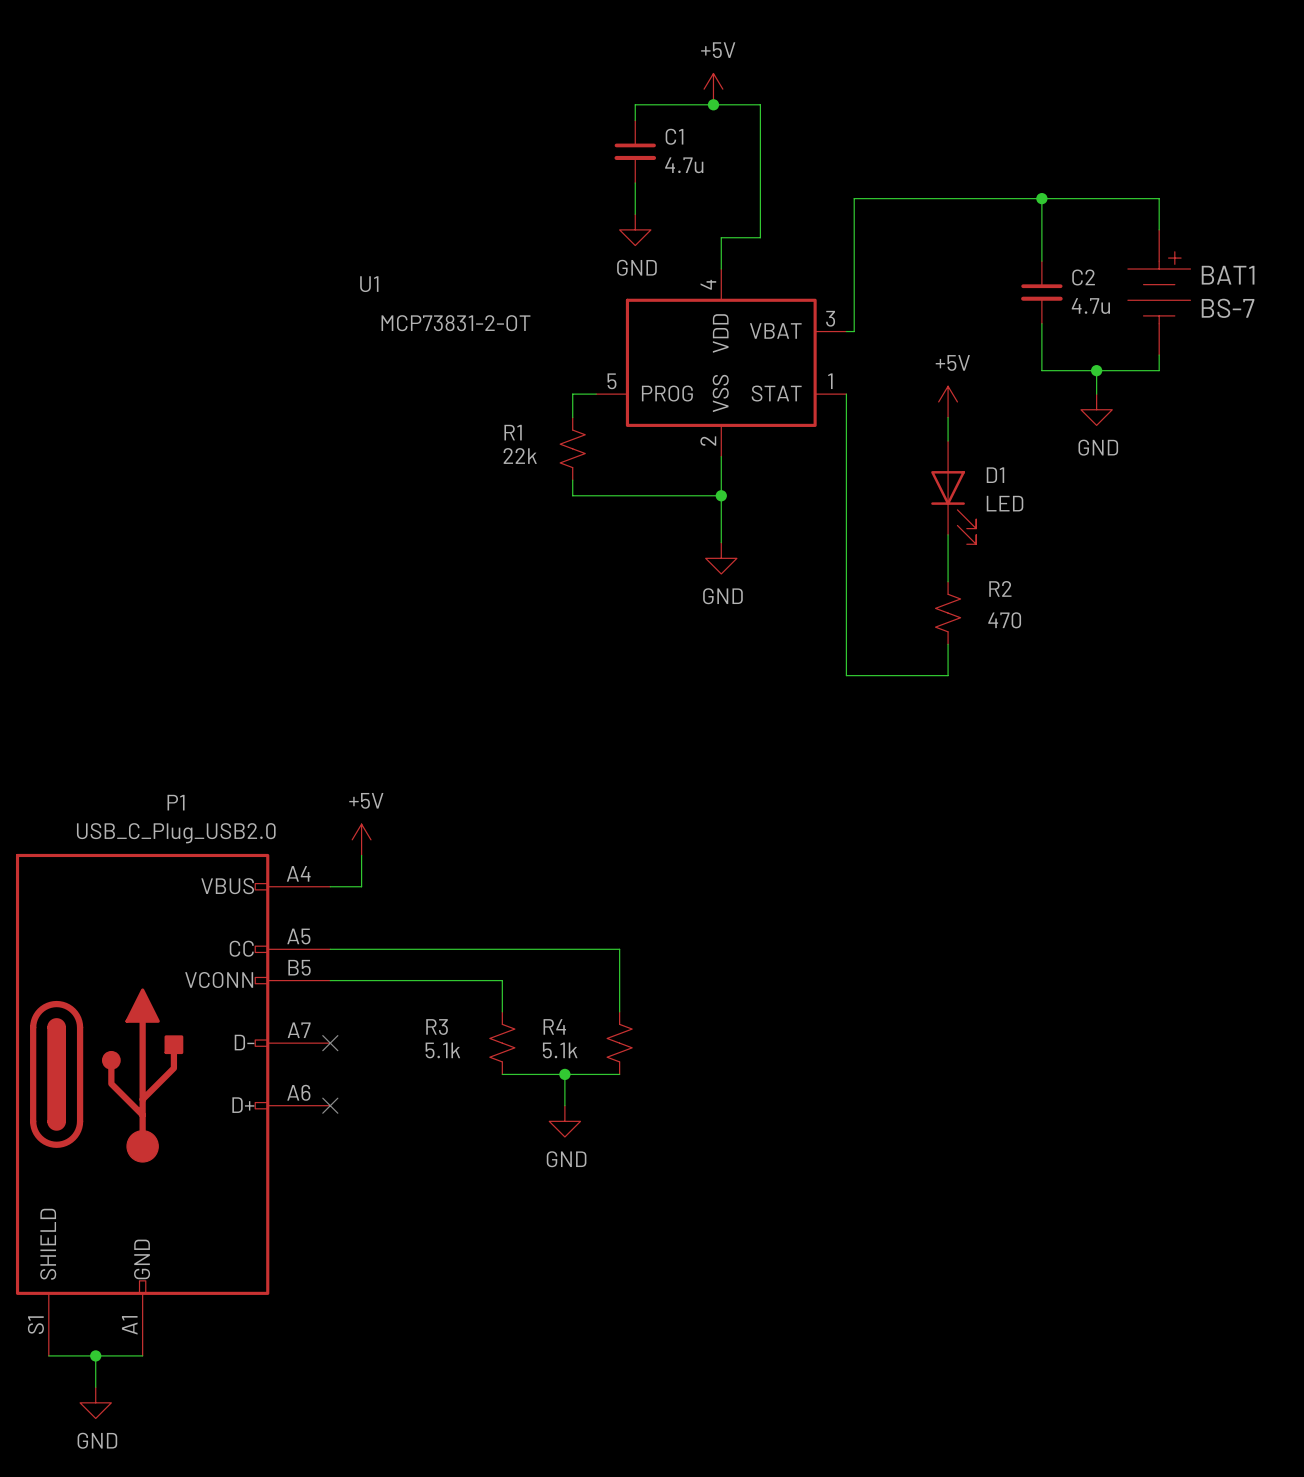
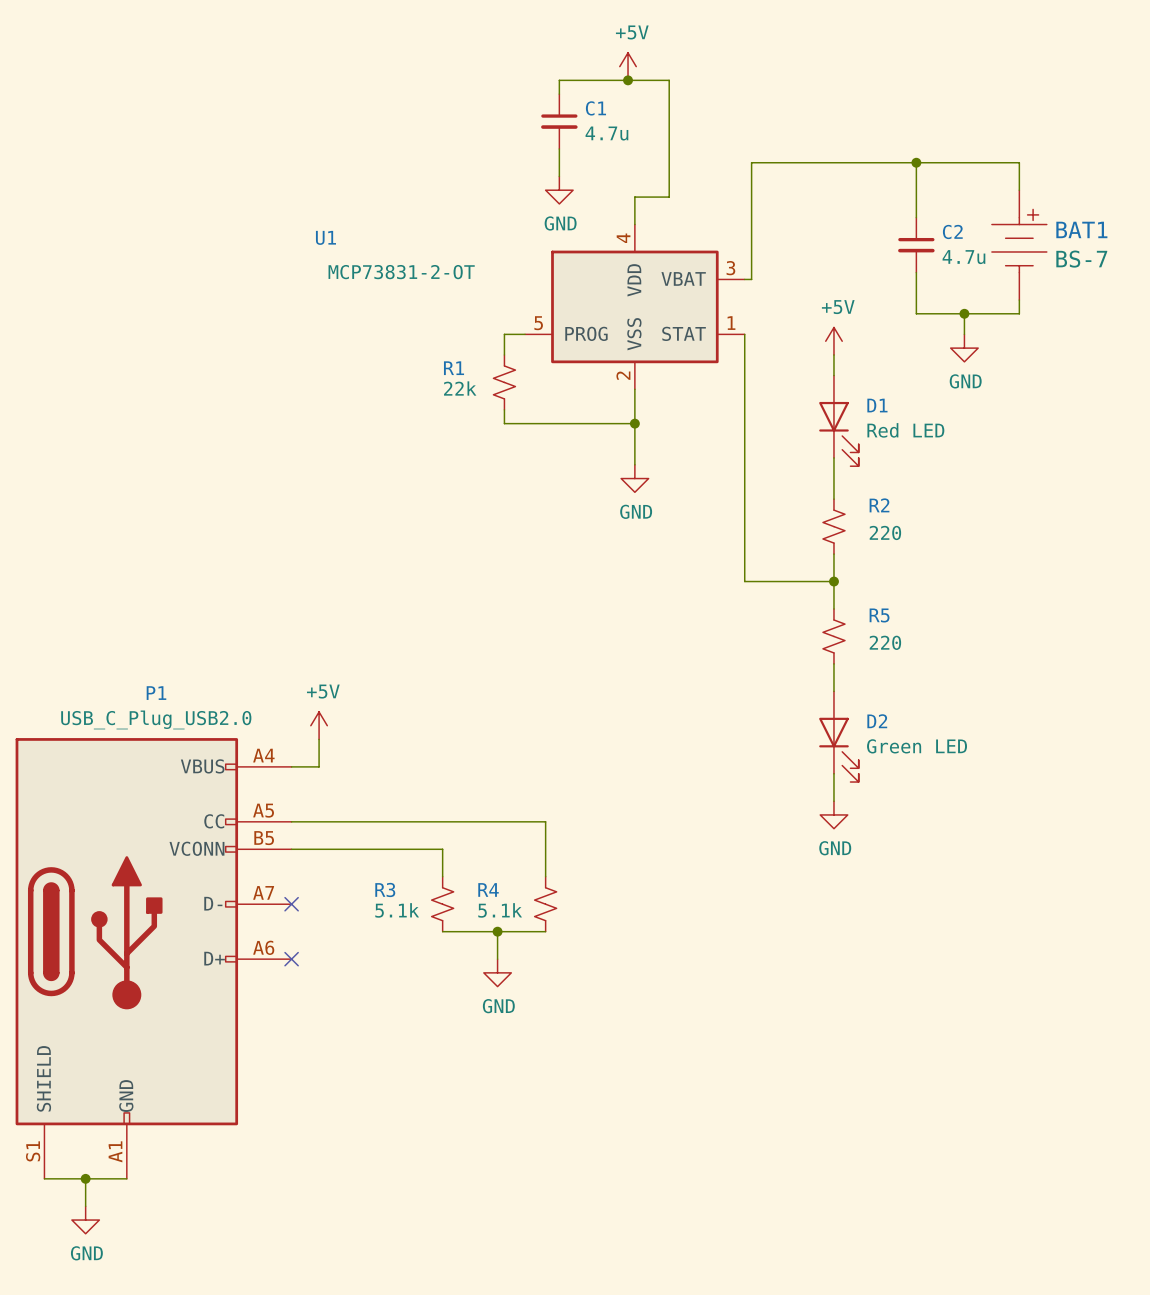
D1 value: LED (1005, 503) -> Red LED (905, 430)
R2 value: 470 (1004, 620) -> 220 (885, 532)
wire: none -> (833, 581) (833, 609)
junction: none -> (833, 581)
R5: none -> 220 (833, 636)
wire: none -> (833, 663) (833, 691)
D2: none -> Green LED (838, 736)
wire: none -> (833, 773) (833, 801)
power symbol: none -> GND (833, 814)

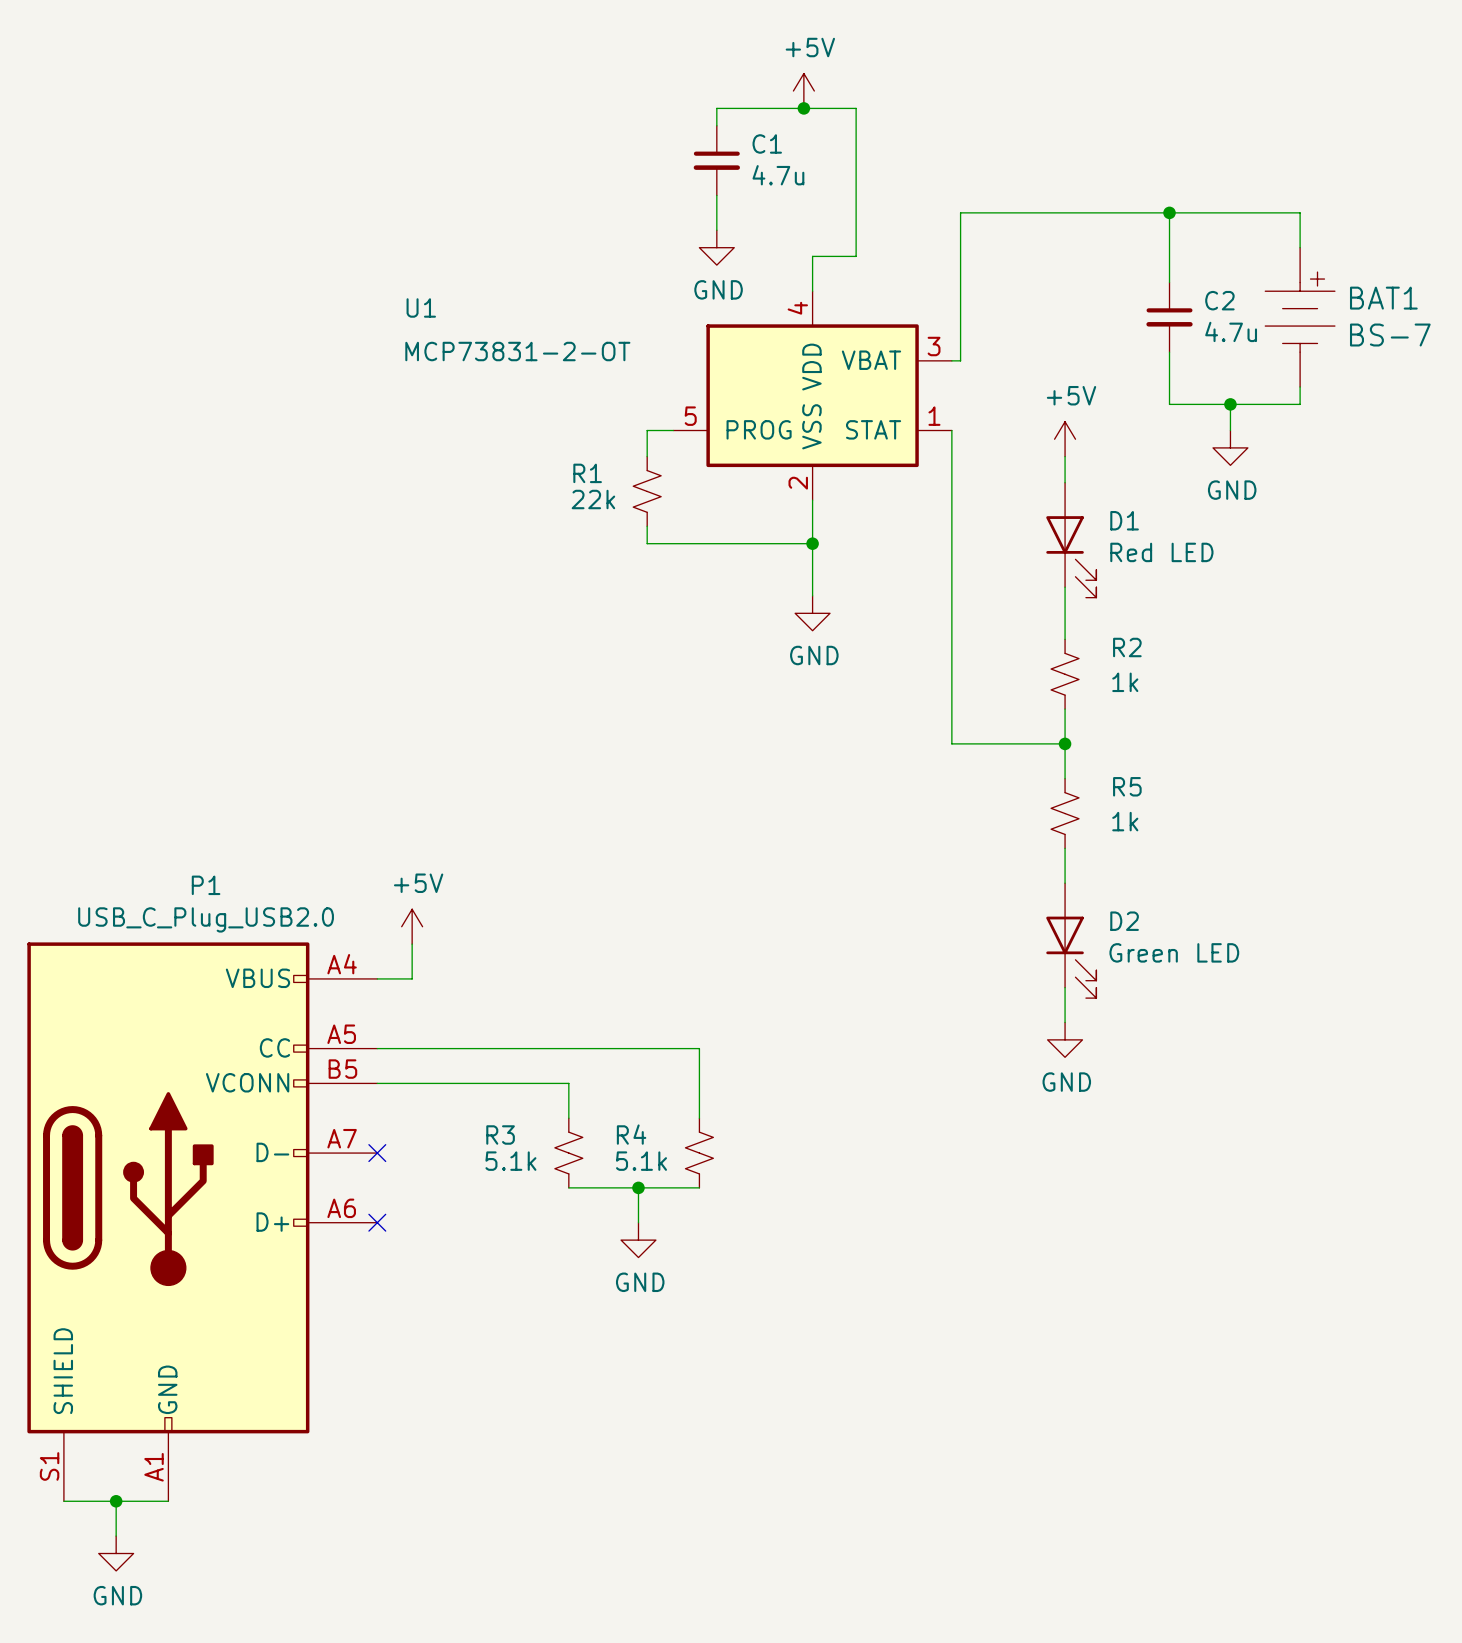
R2 value: 220 (885, 532) -> 1k (1125, 682)
R5 value: 220 (885, 642) -> 1k (1125, 821)

